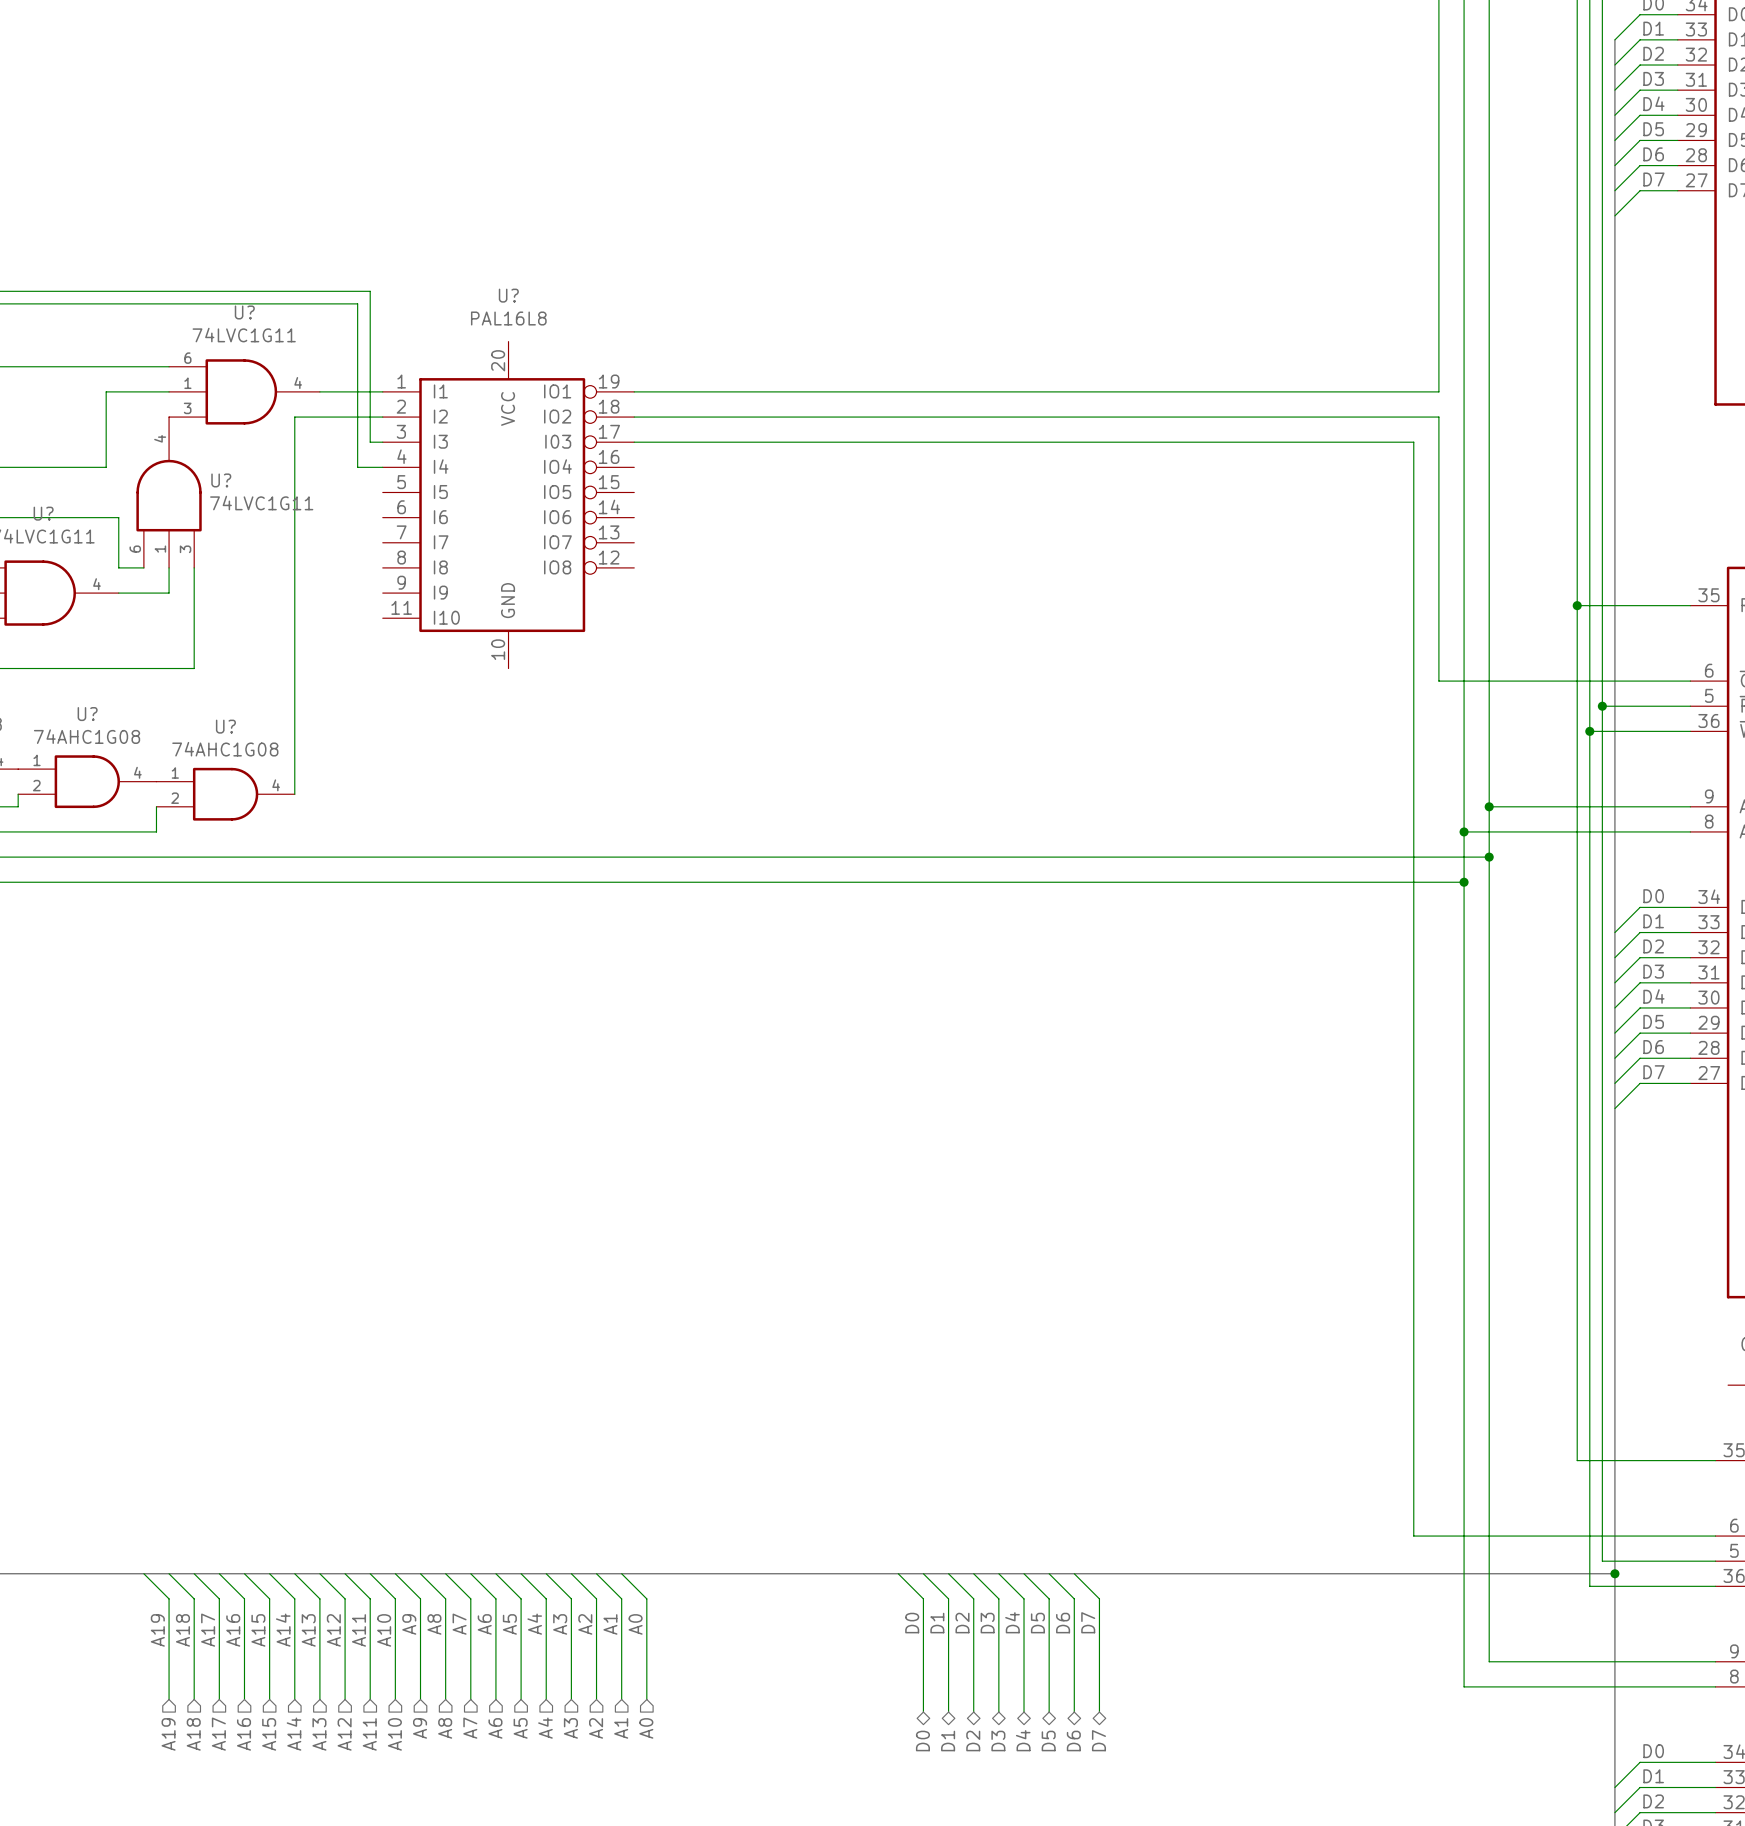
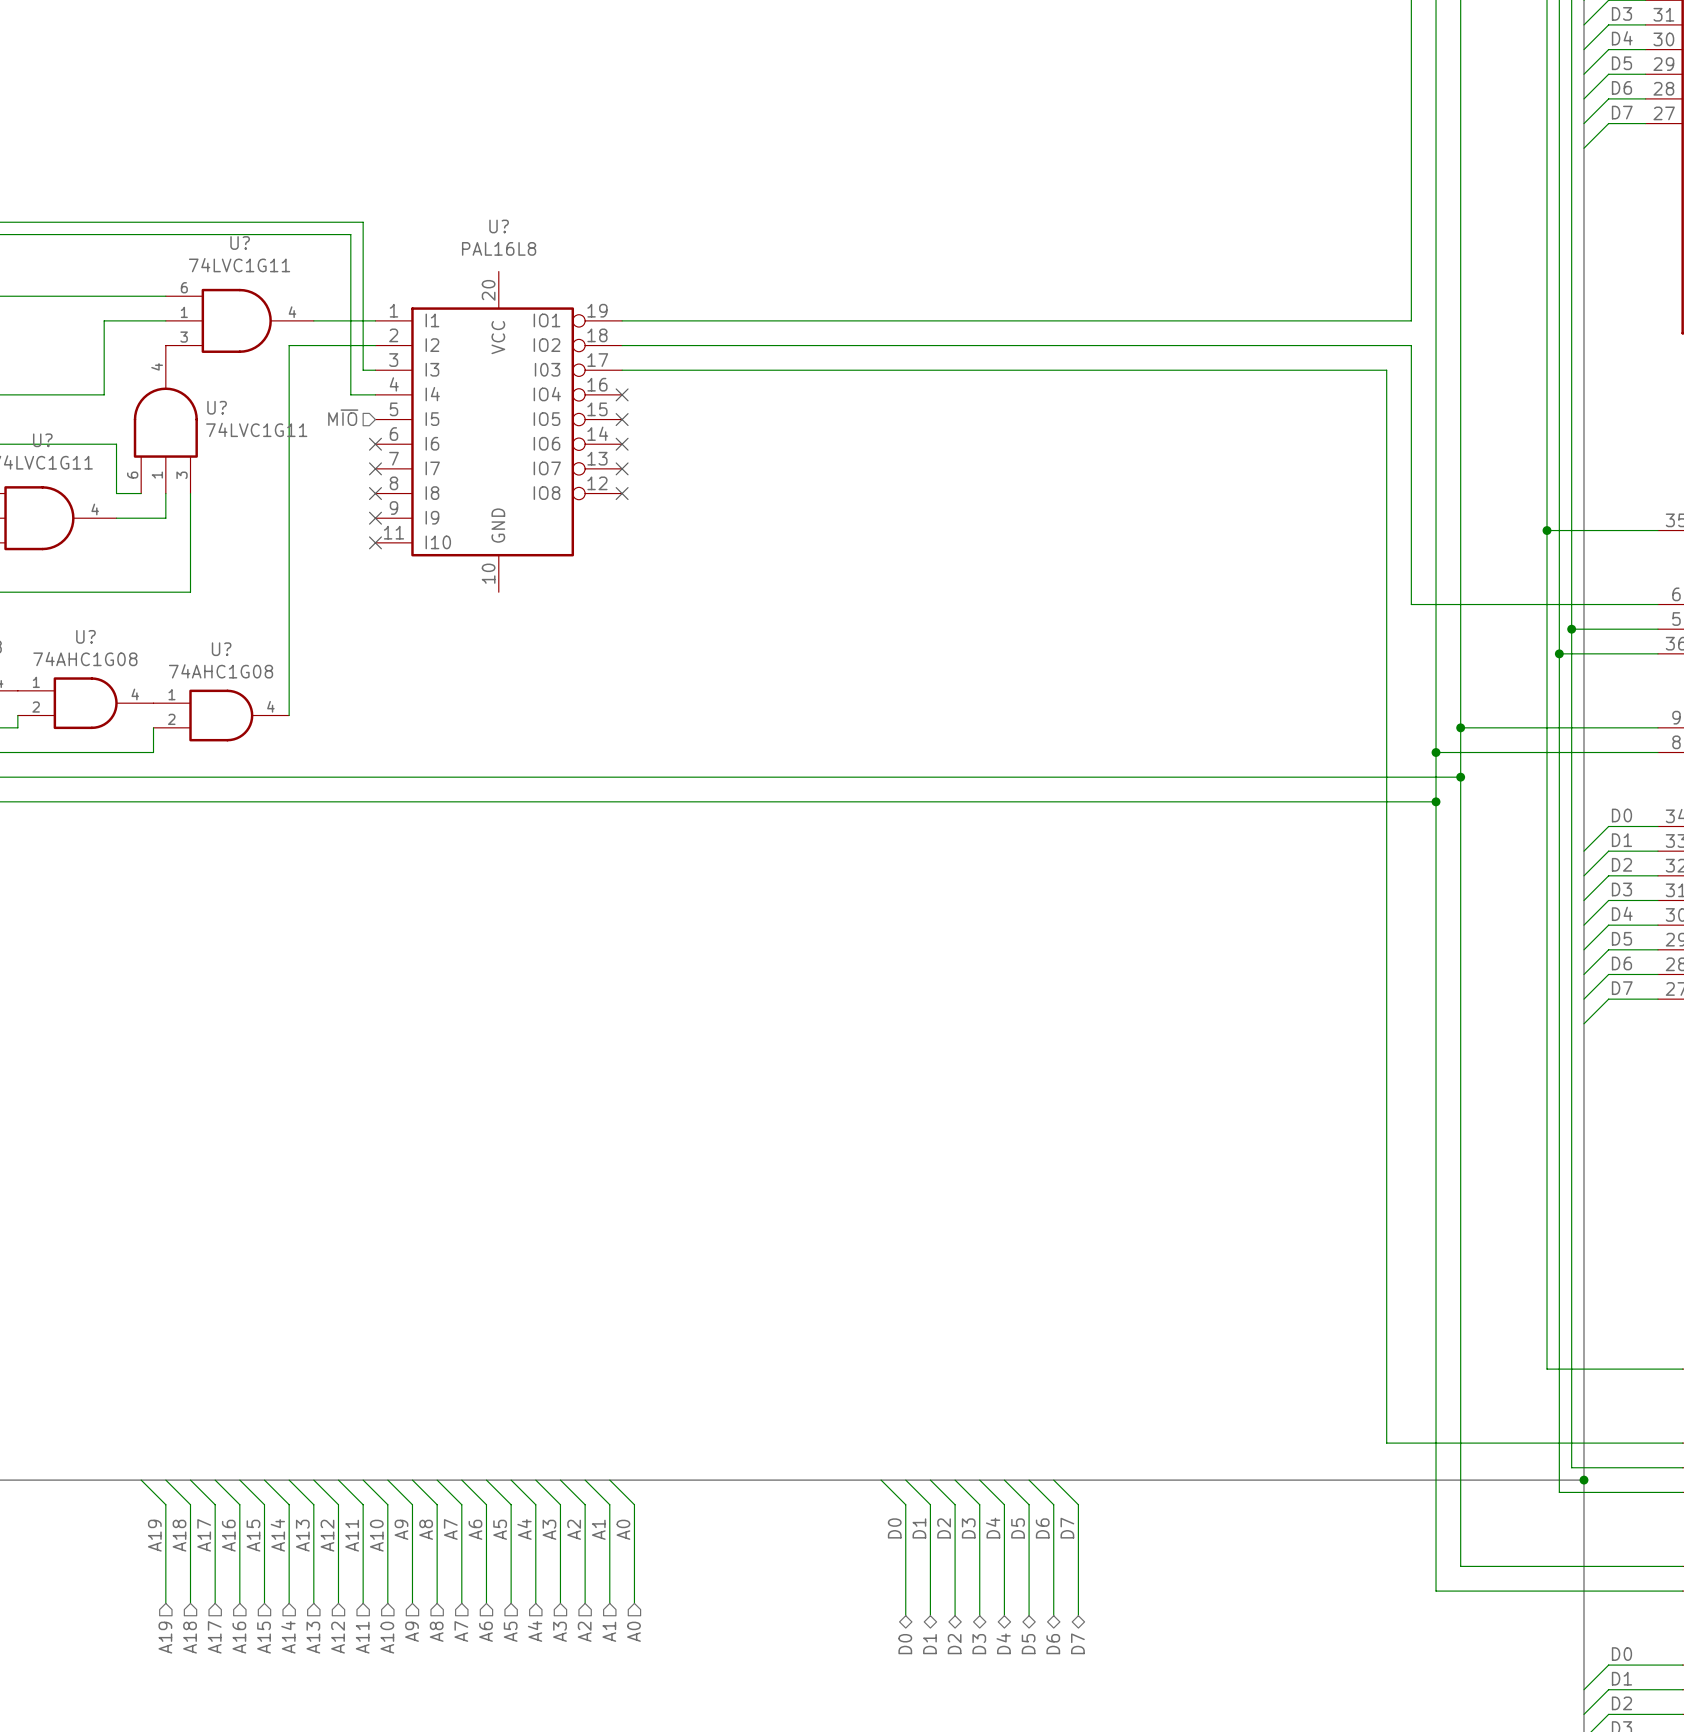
no-connect mark: none -> (622, 394)
hierarchical label: none -> M~{IO} (343, 417)
no-connect mark: none -> (622, 419)
no-connect mark: none -> (375, 444)
no-connect mark: none -> (622, 444)
no-connect mark: none -> (375, 468)
no-connect mark: none -> (622, 468)
no-connect mark: none -> (375, 493)
no-connect mark: none -> (622, 493)
no-connect mark: none -> (375, 518)
no-connect mark: none -> (375, 542)

